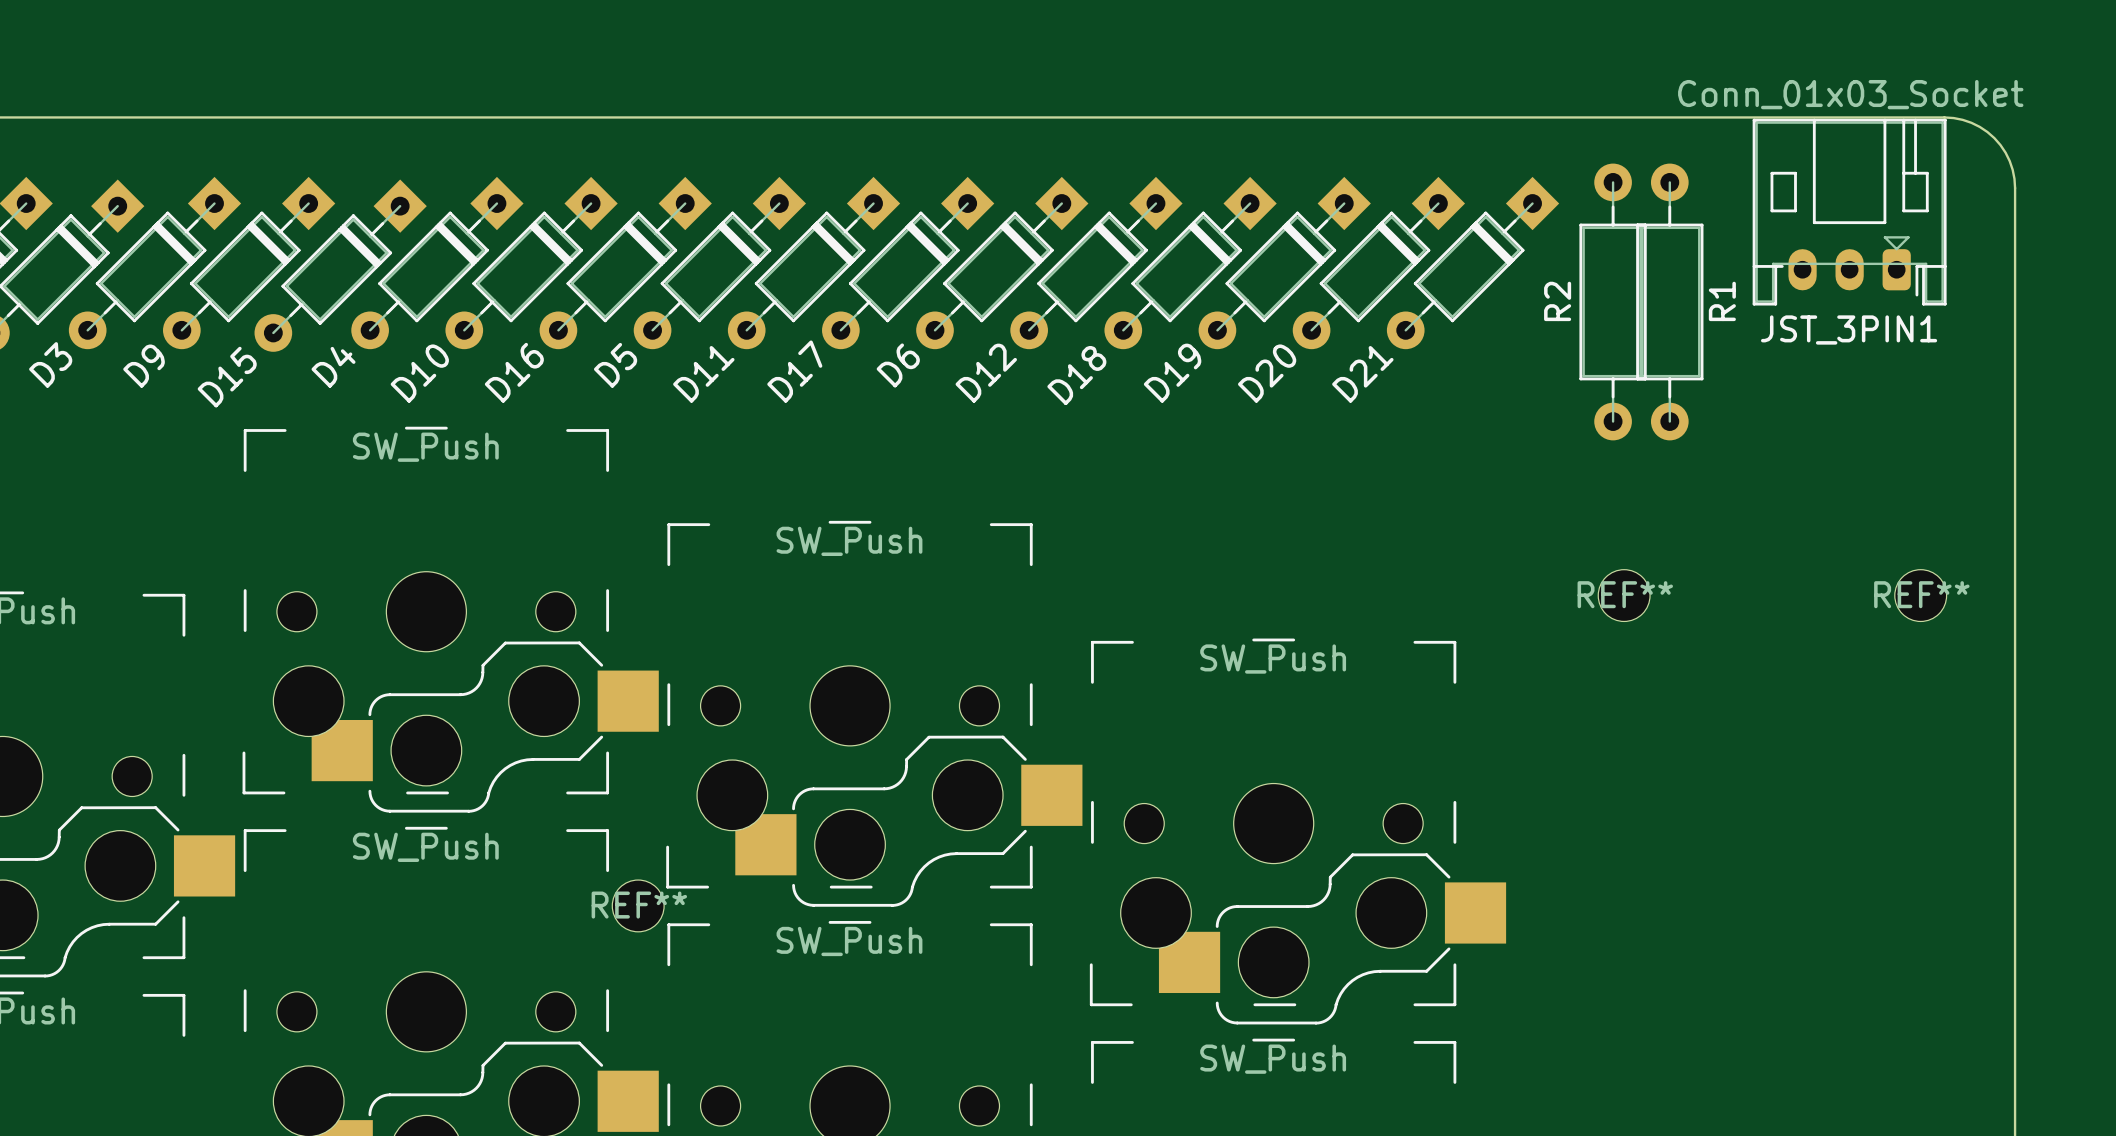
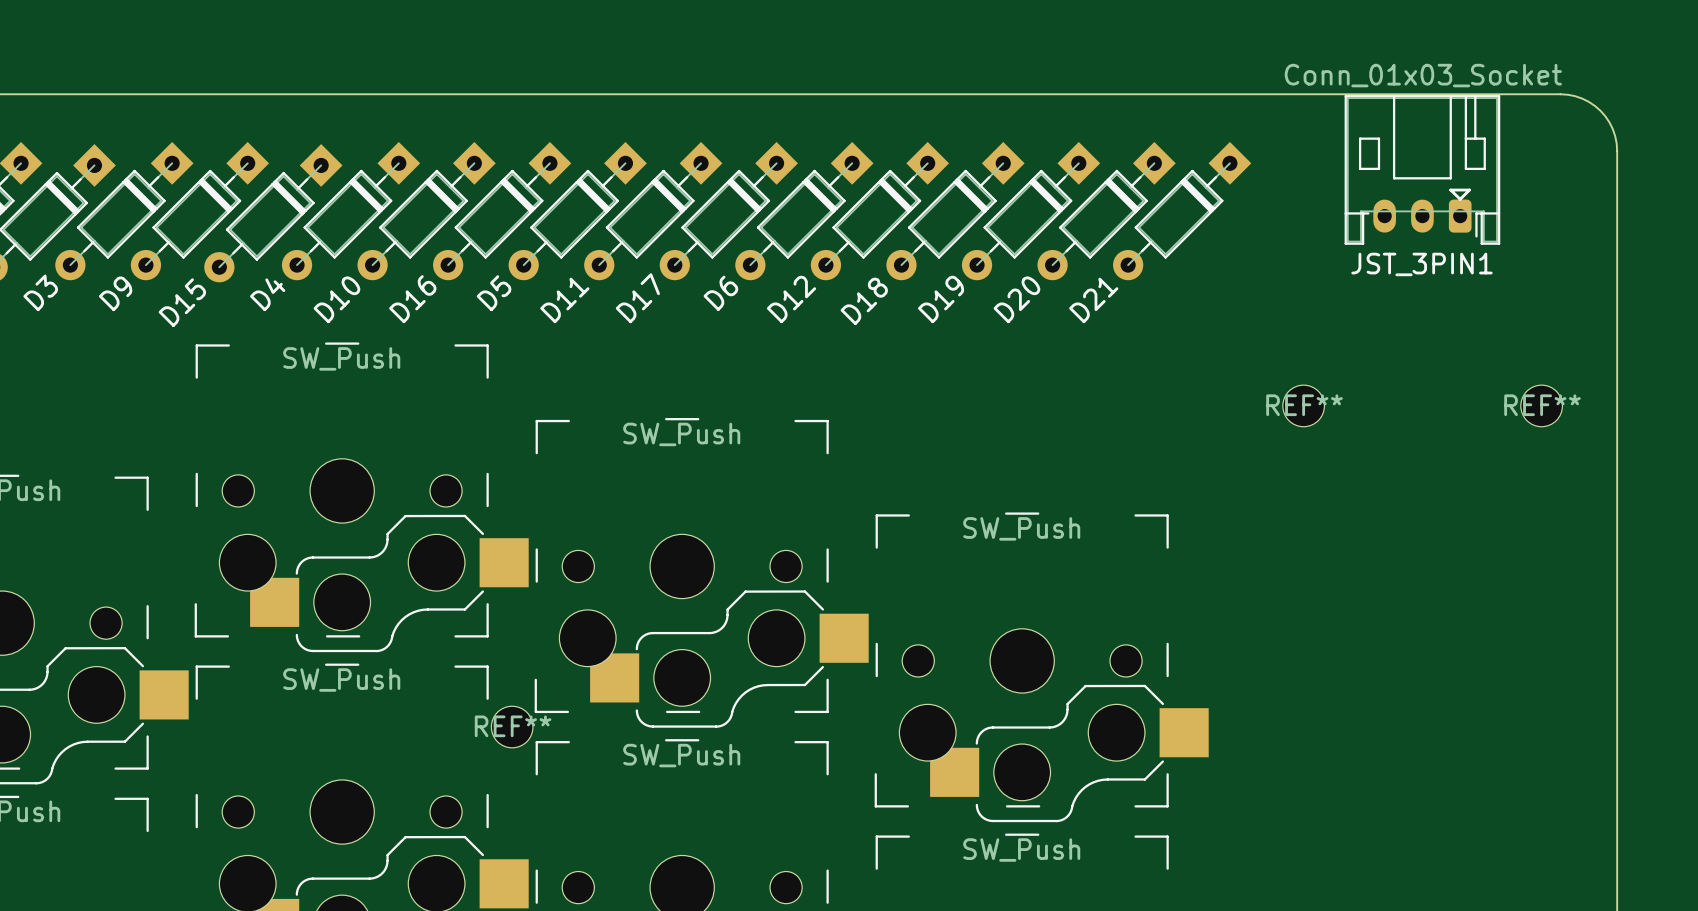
JST_3PIN1 position: (1849, 212) -> (1422, 169)
line: none -> (1450, 190) (1469, 190) (1460, 199) (1450, 190)
R2: (1613, 301) -> none
R1: (1669, 301) -> none
REF** position: (1624, 595) -> (1303, 405)
REF** position: (1920, 595) -> (1541, 405)

